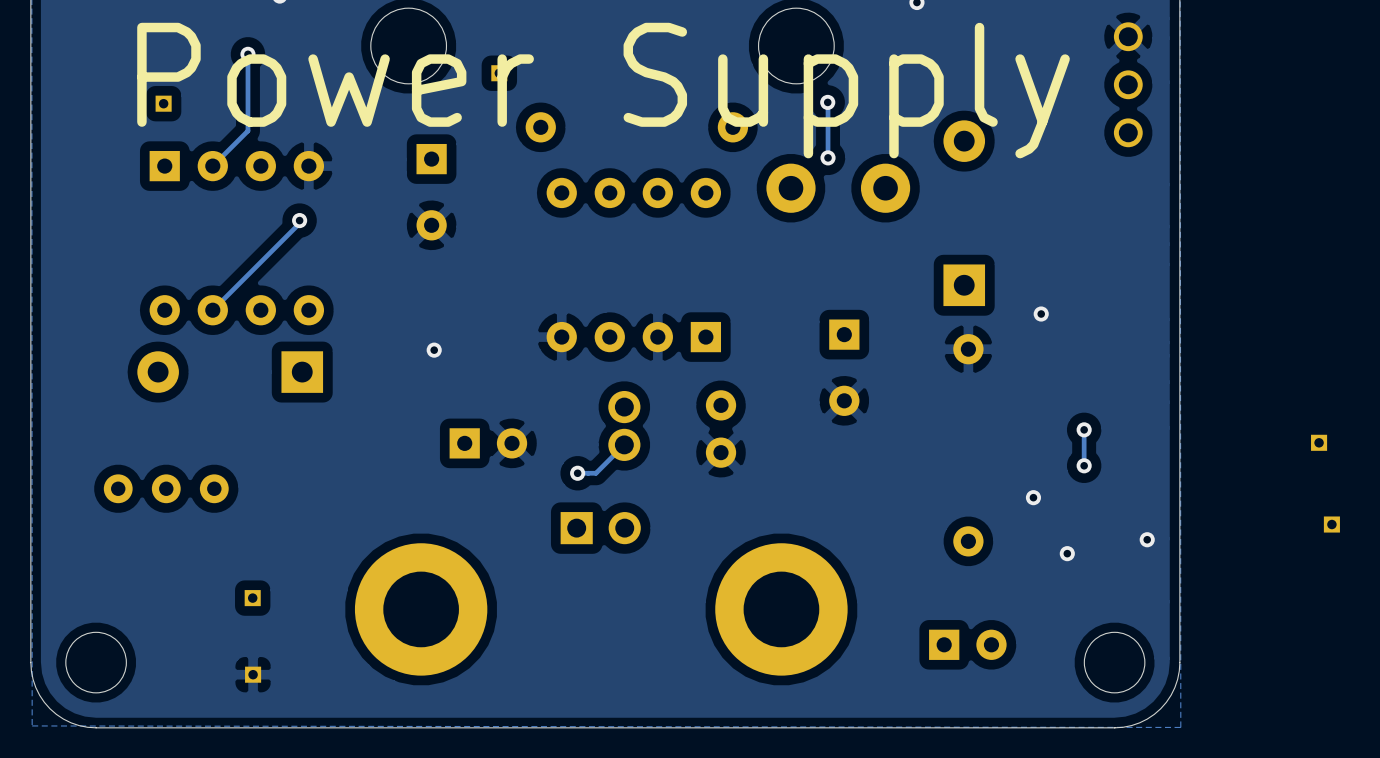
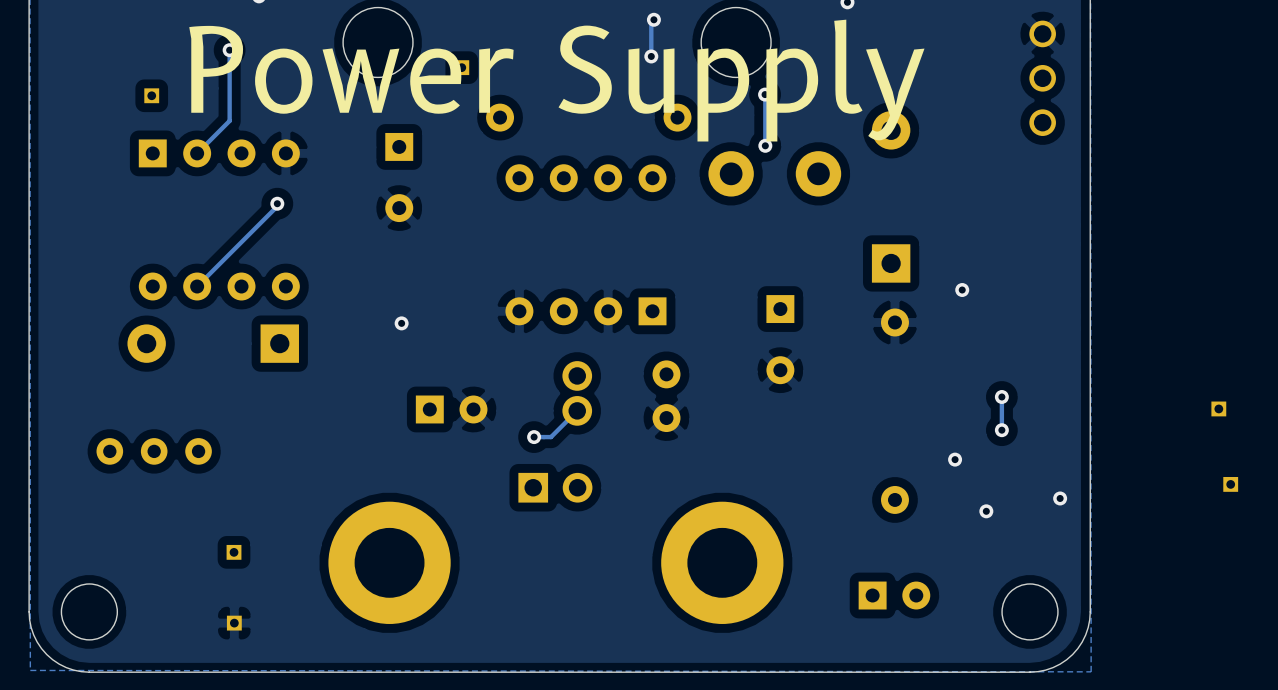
track: none -> (653, 19) (651, 22) (651, 56)
via: none -> (653, 19)
via: none -> (651, 56)

